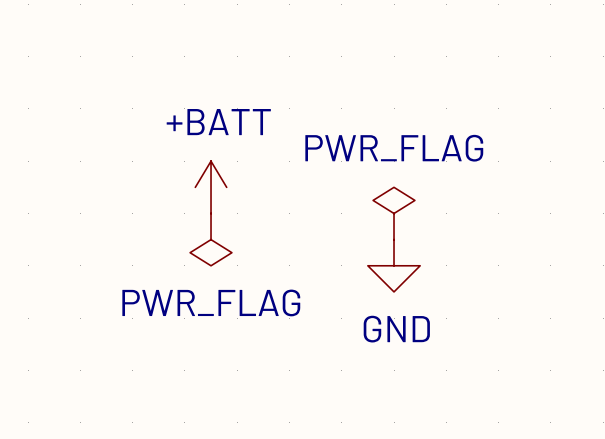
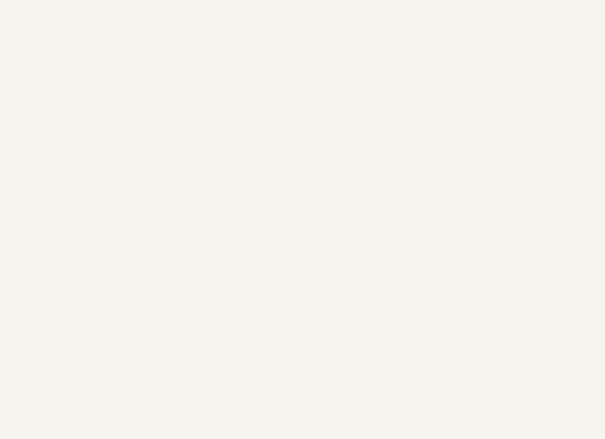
power symbol: +BATT (211, 187) -> none
power symbol: PWR_FLAG (394, 213) -> none
power symbol: PWR_FLAG (211, 239) -> none
power symbol: GND (394, 265) -> none

